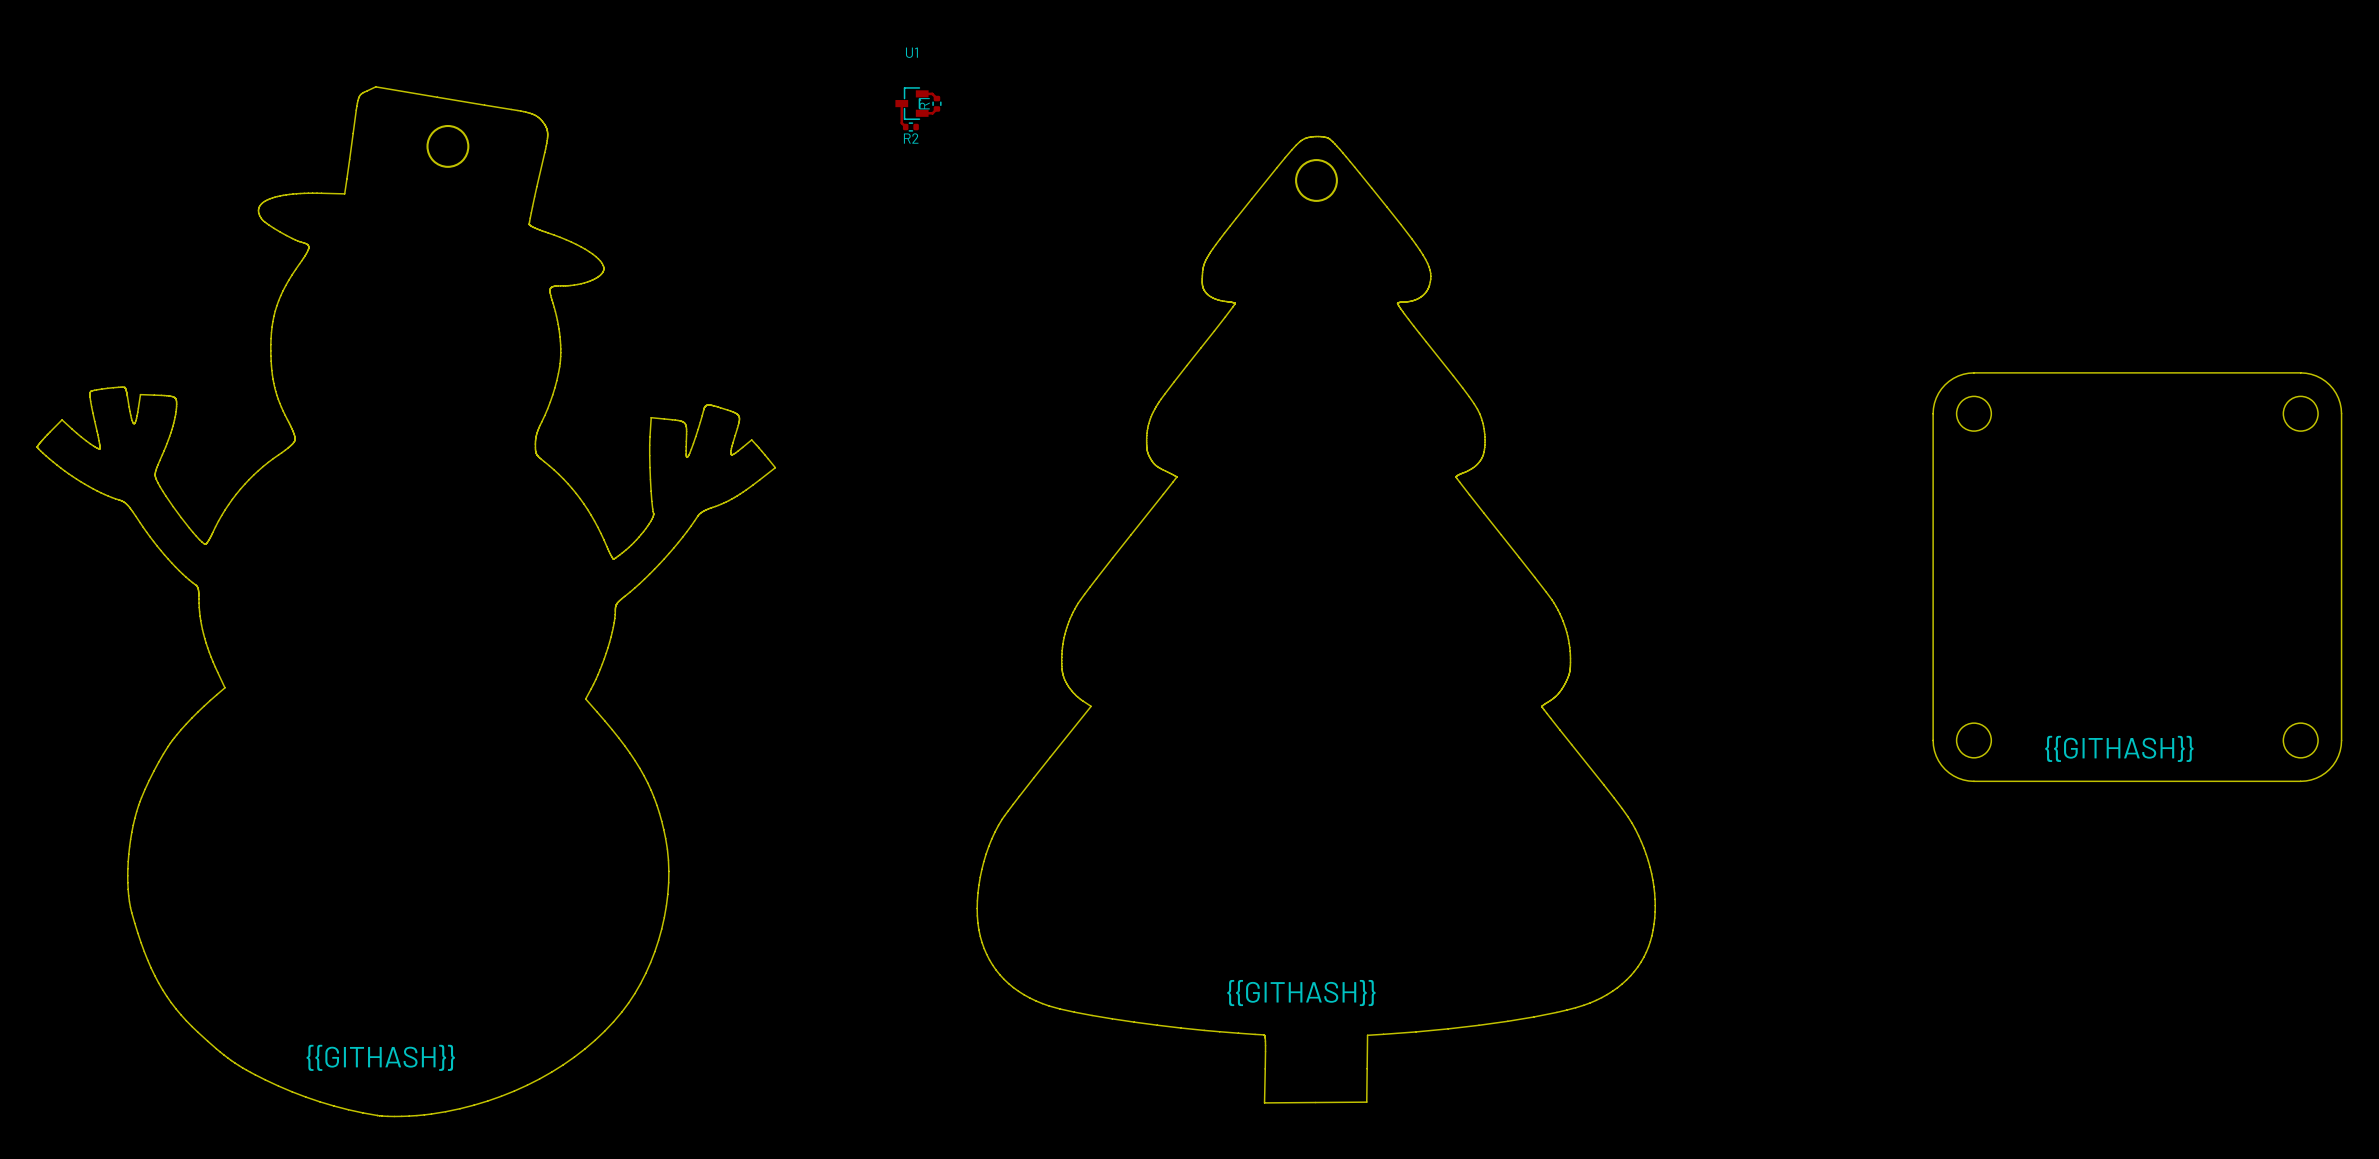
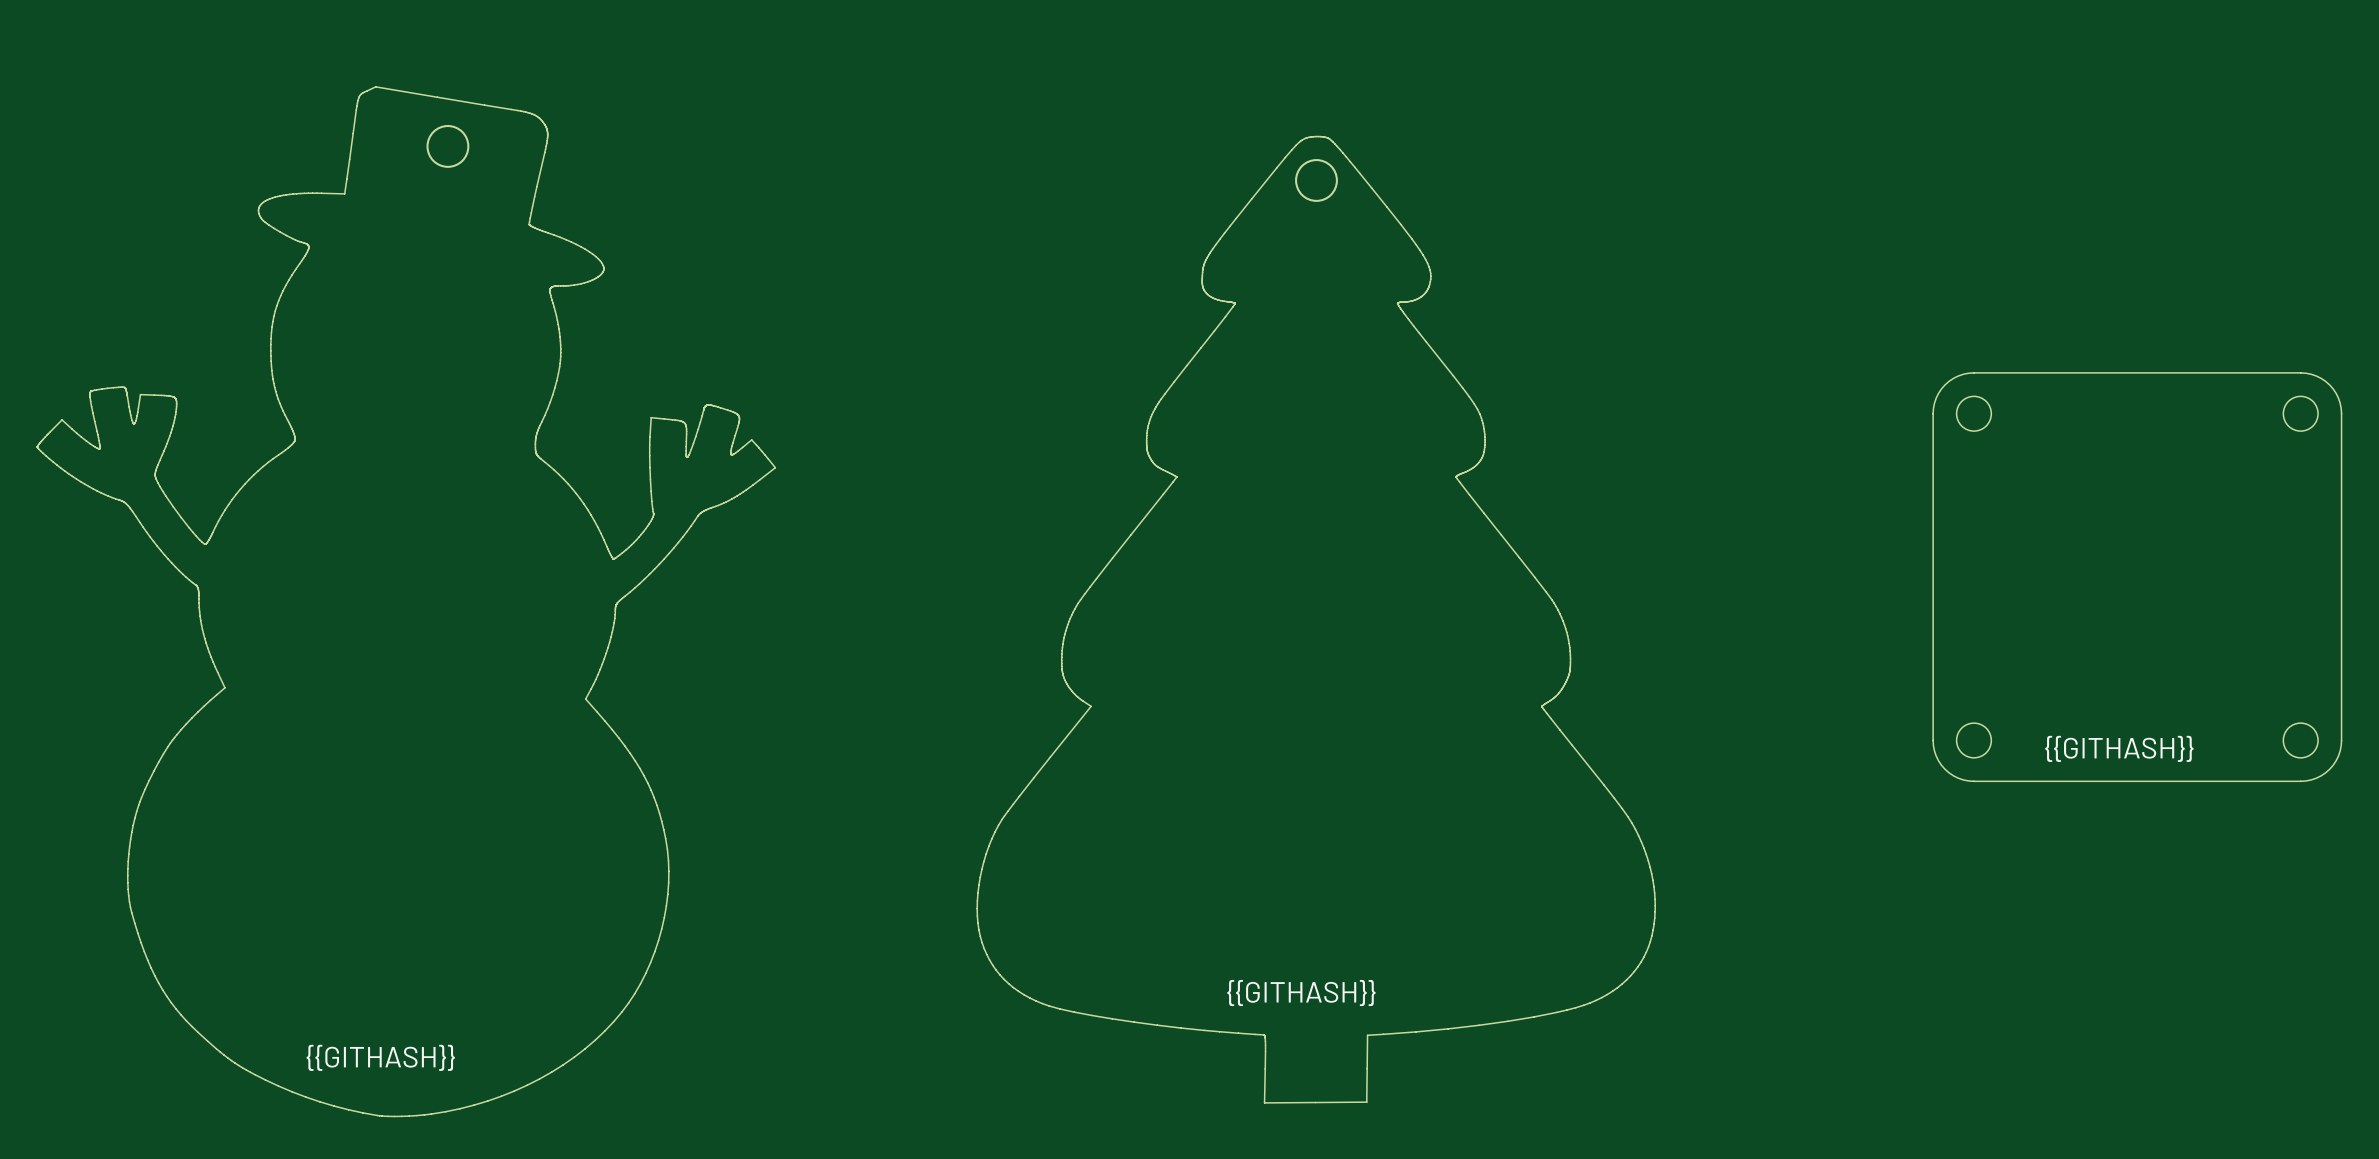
track: (922, 93) (932, 93) (936, 98) -> none
track: (901, 103) (901, 123) (905, 127) -> none
U1: (911, 103) -> none
R1: (936, 103) -> none
track: (936, 108) (932, 113) (922, 113) -> none
R2: (910, 127) -> none

